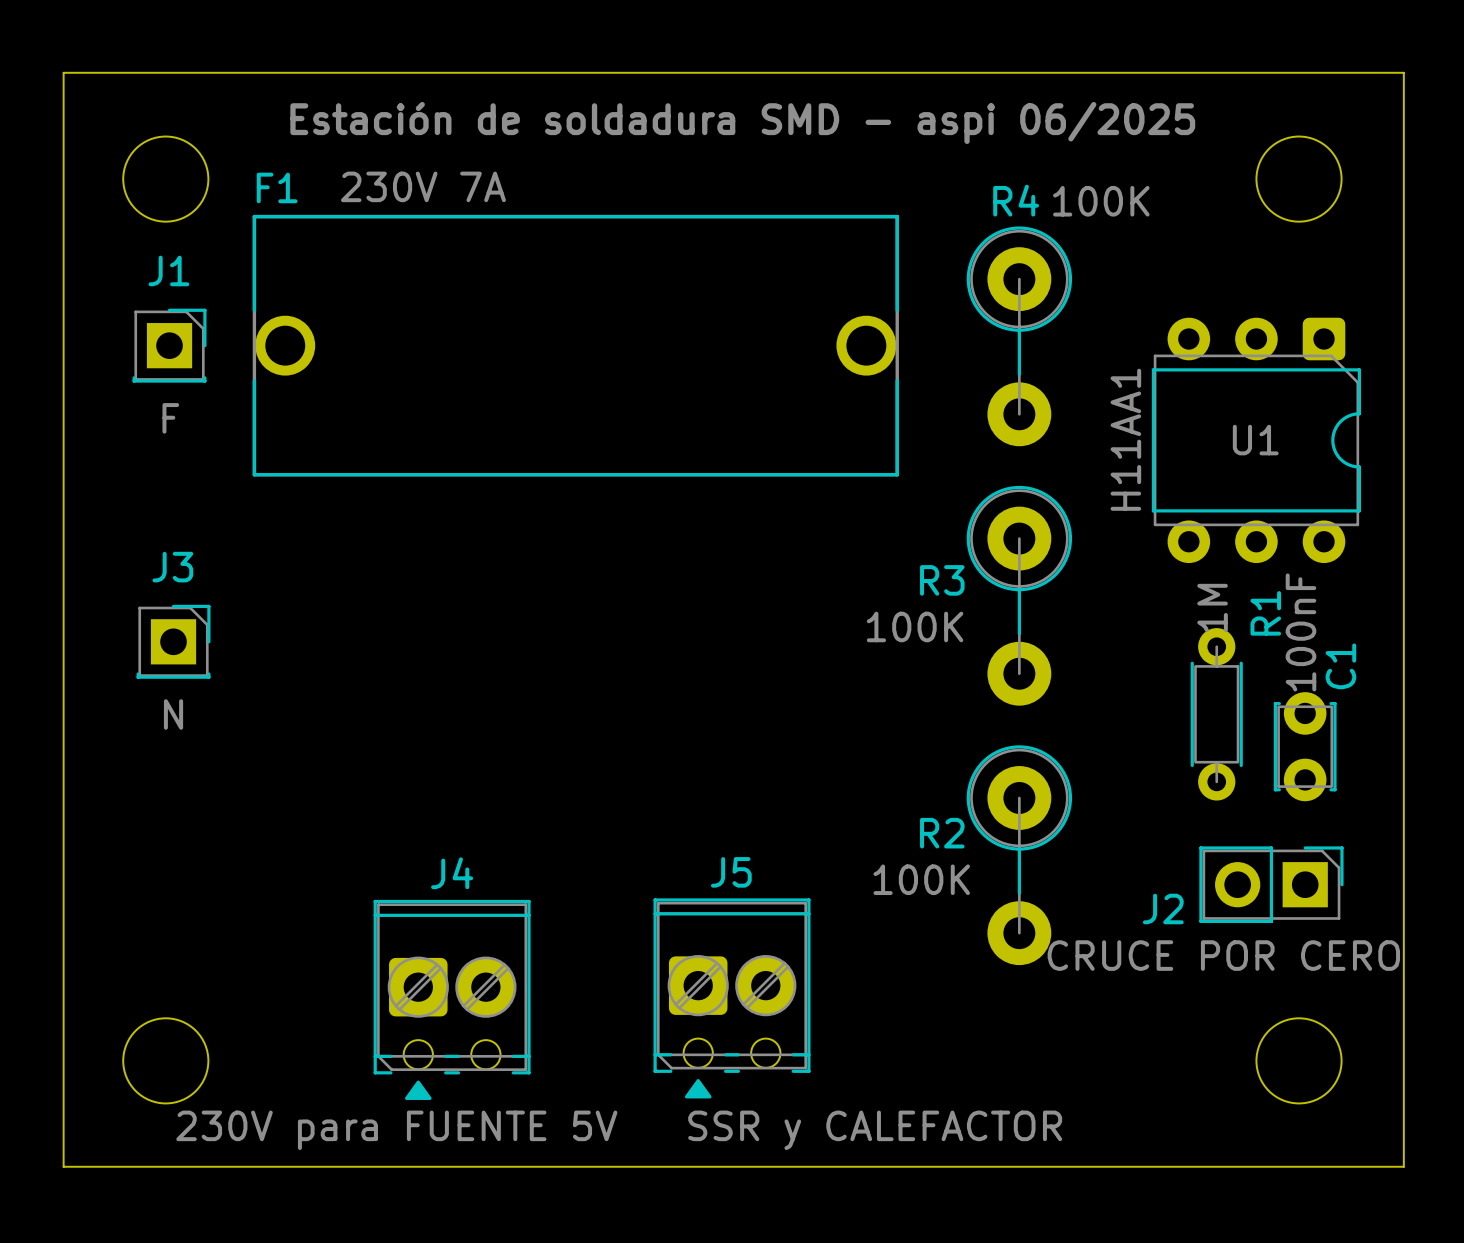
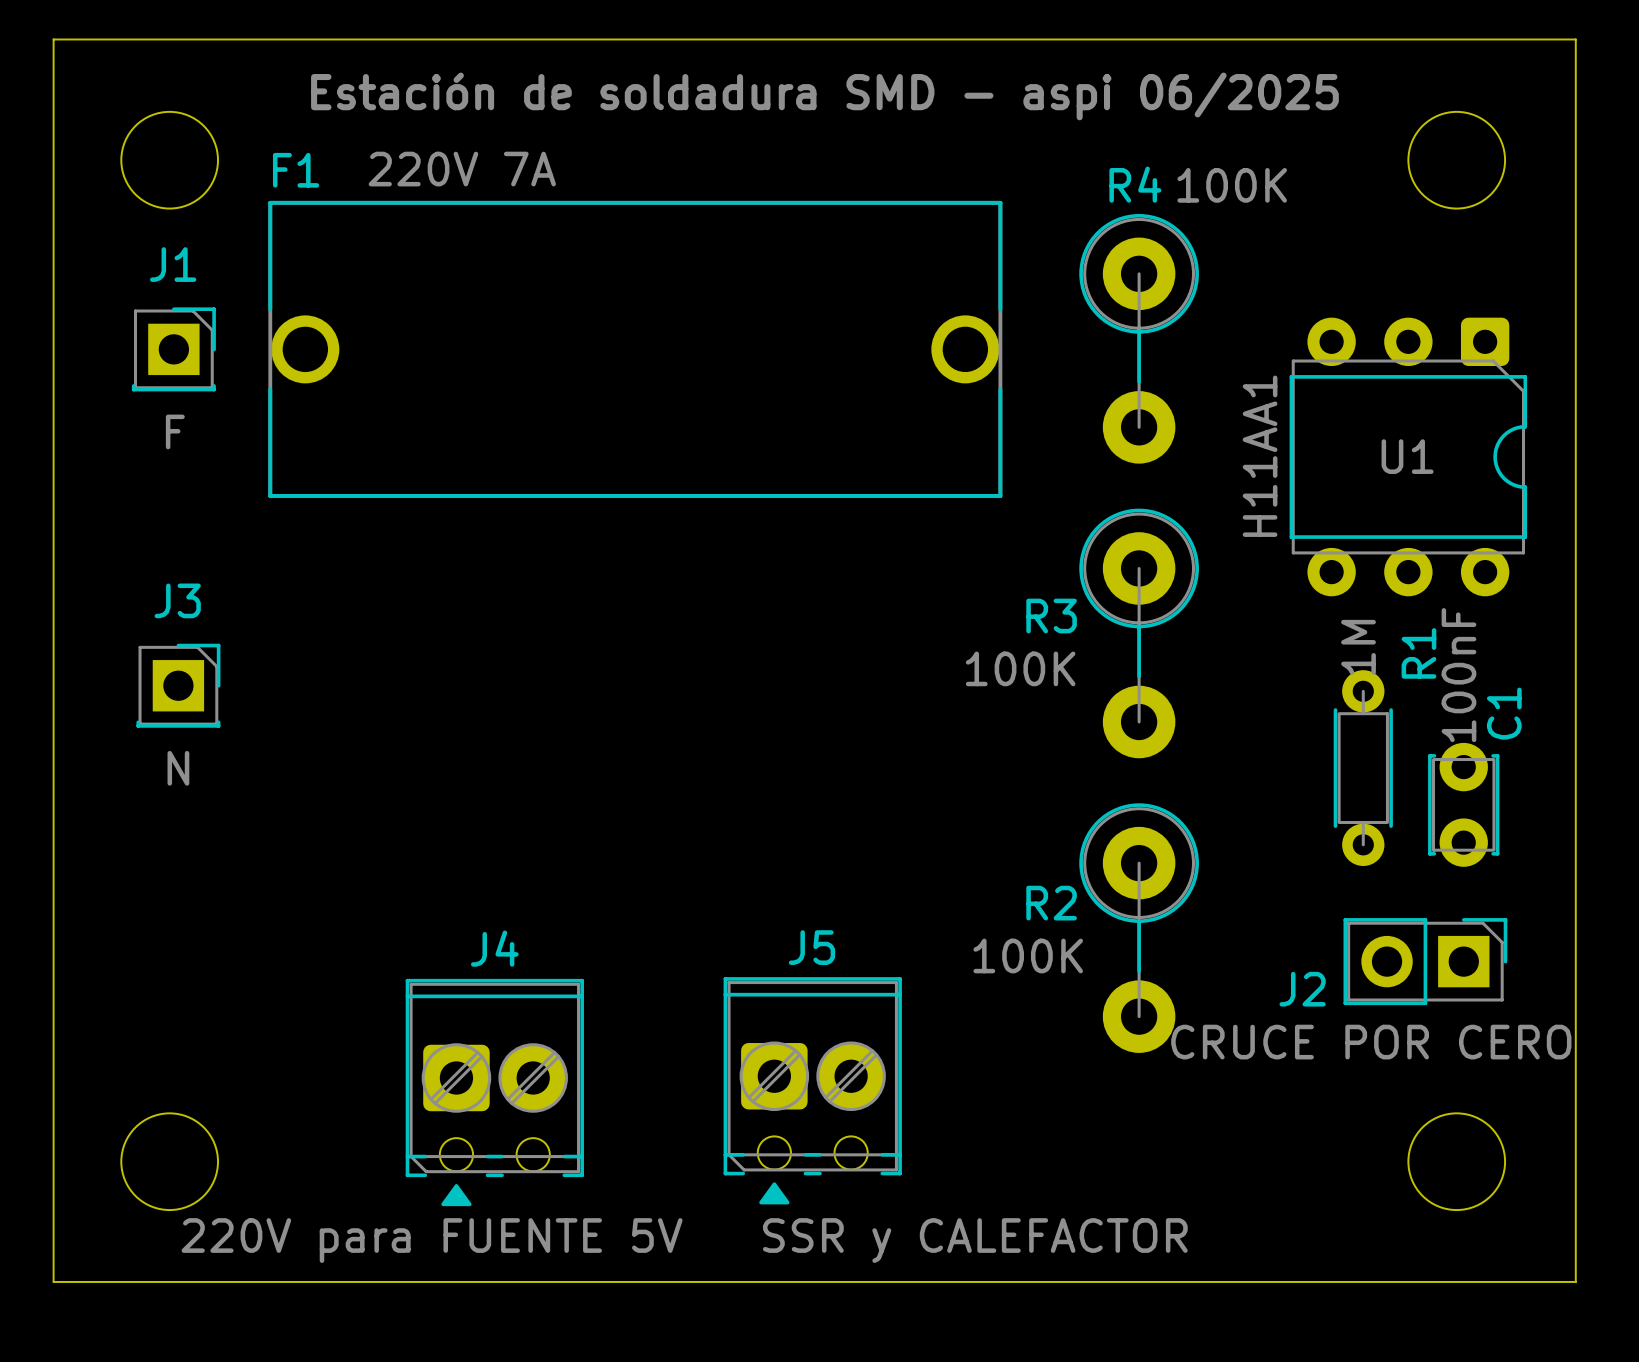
F1 value: 230V 7A (423, 186) -> 220V 7A (462, 169)
J4 value: 230V para FUENTE 5V (396, 1130) -> 220V para FUENTE 5V (432, 1240)

